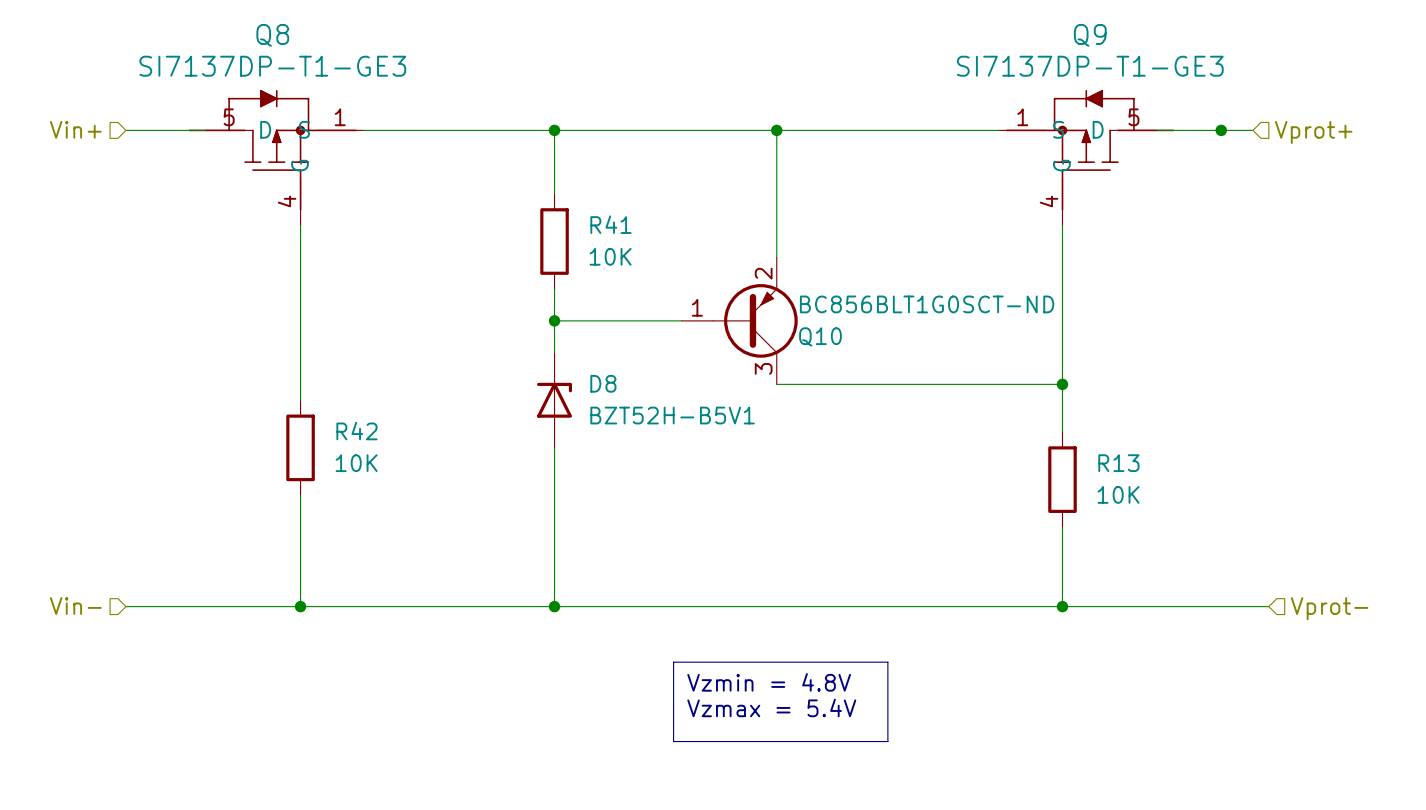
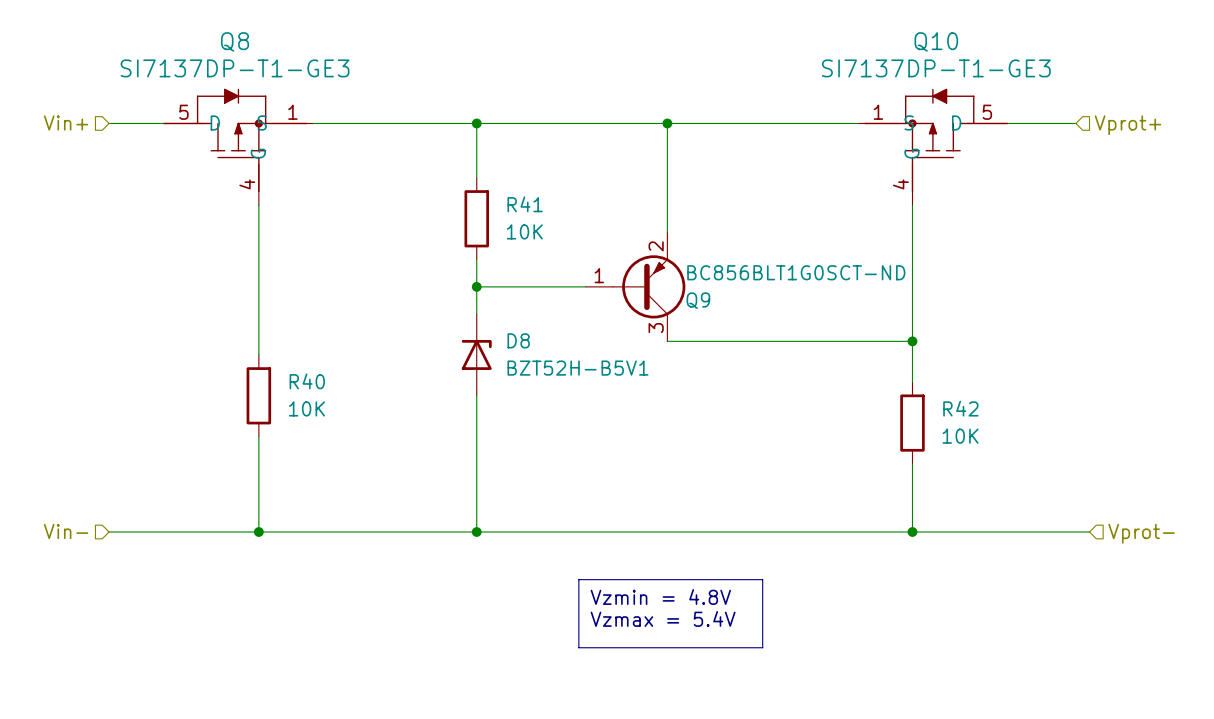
Q8 symbol: [188, 89, 365, 226] -> [162, 88, 314, 206]
junction: (1221, 130) -> none
Q9: SI7137DP-T1-GE3 (1086, 157) -> none
Q10: none -> SI7137DP-T1-GE3 (933, 146)
Q10 name: Q10 (820, 336) -> Q9 (698, 300)
R42 name: R42 (356, 431) -> R40 (307, 381)
R13 name: R13 (1118, 463) -> R42 (960, 408)

